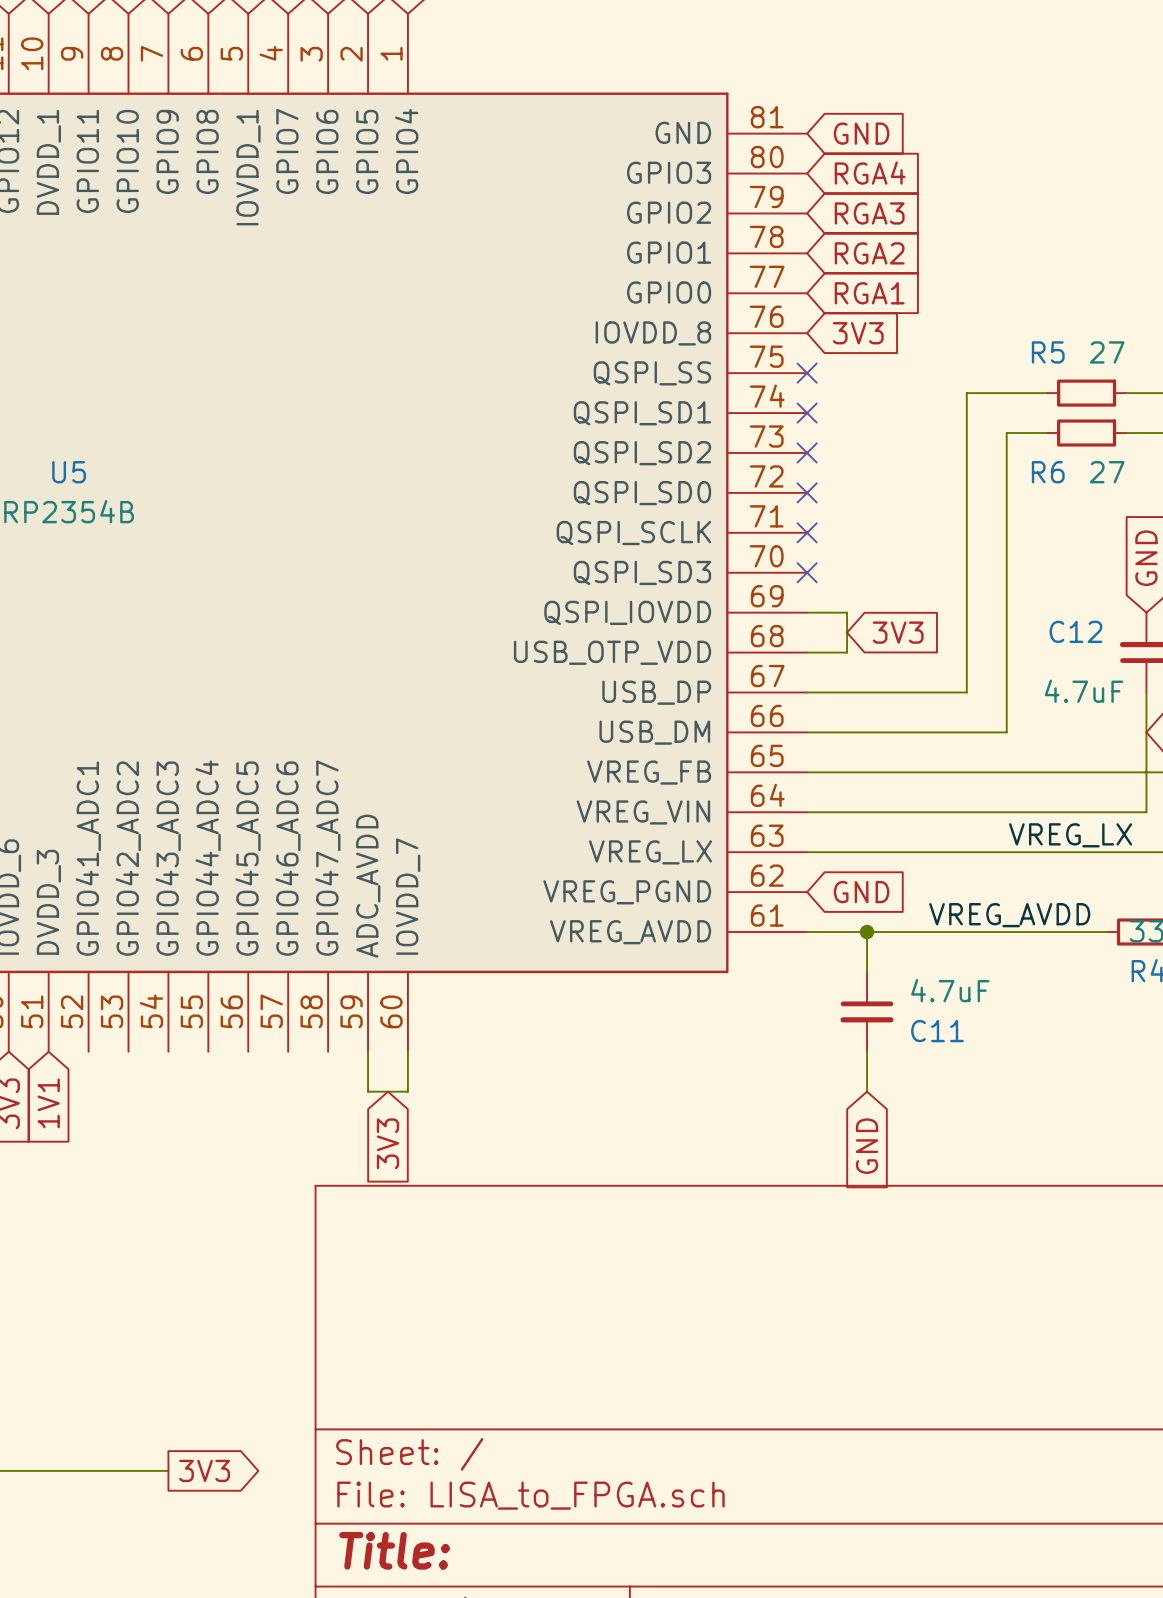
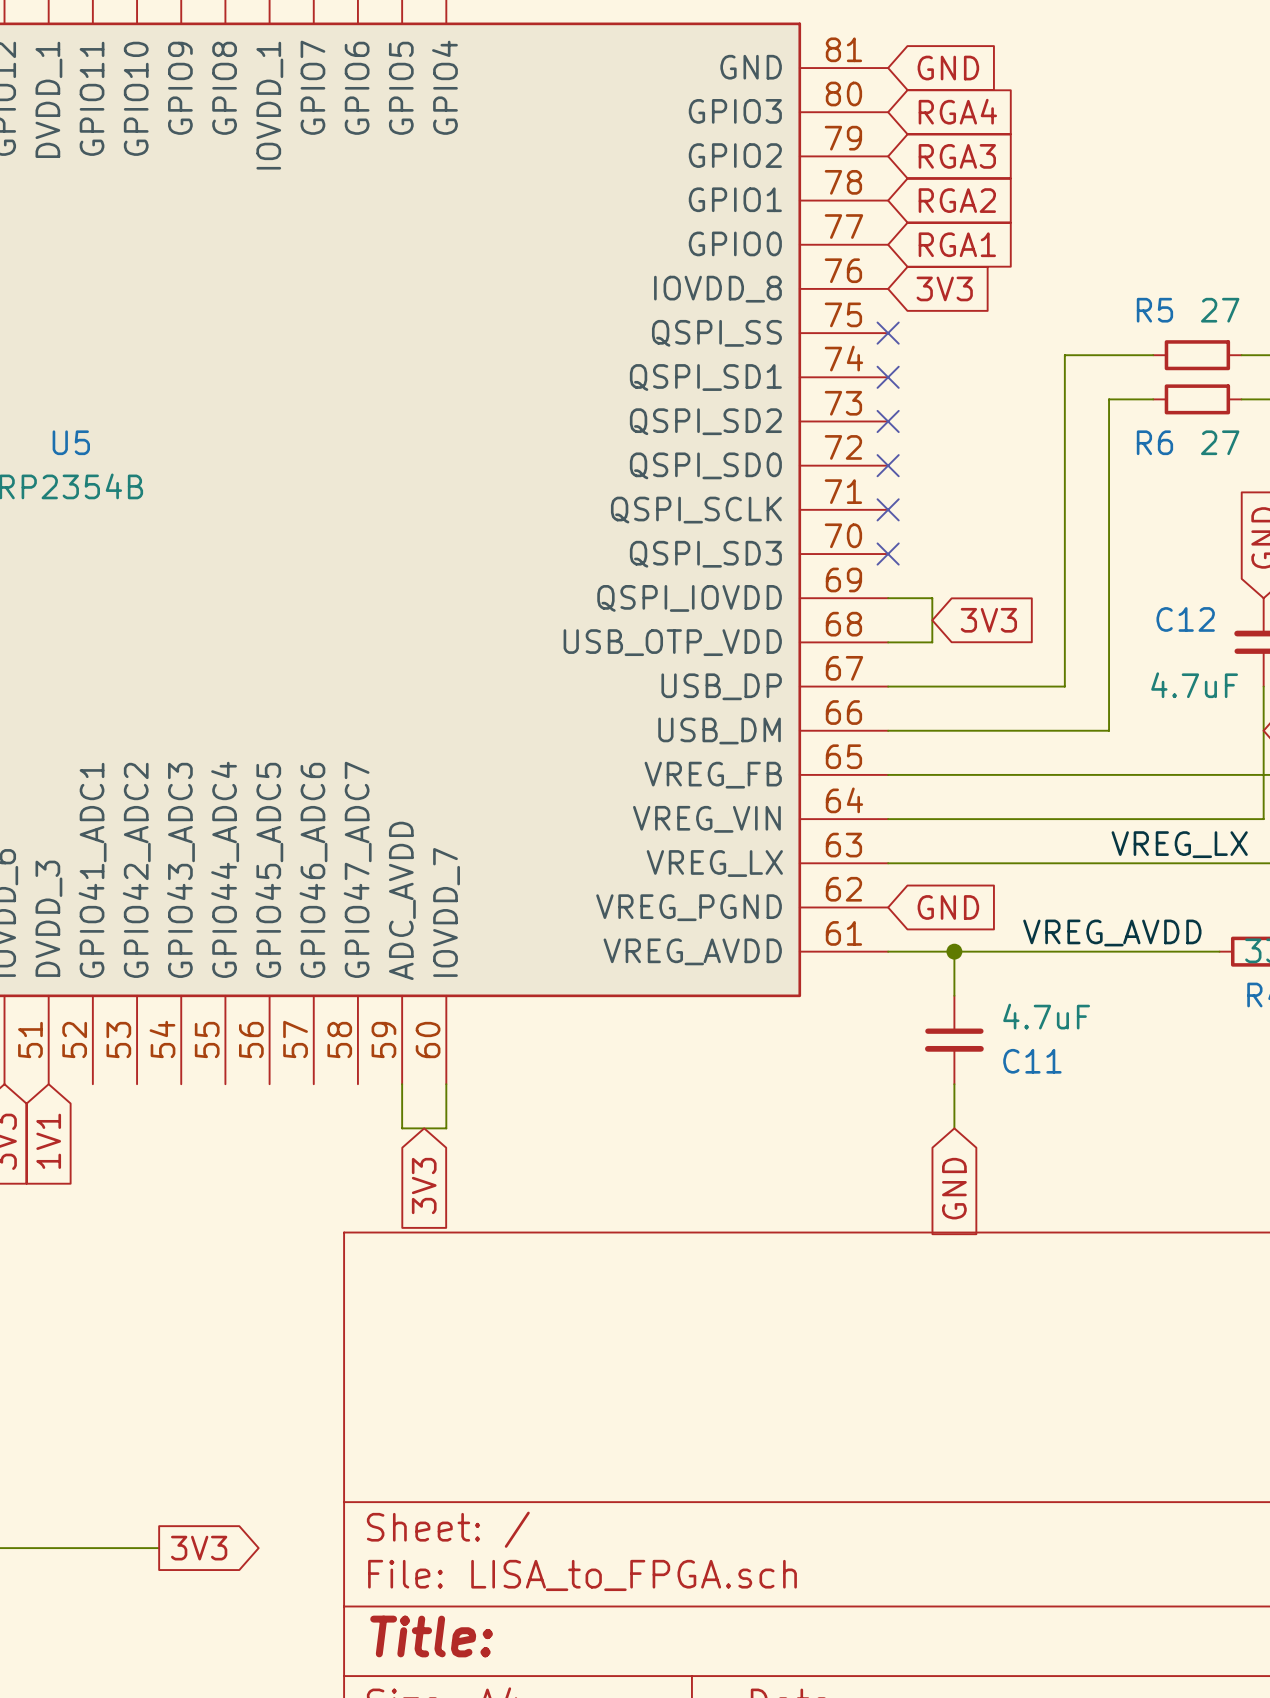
wire: (148, 1470) (168, 1470) -> none
global label position: 3V3 (204, 1470) -> 3V3 (199, 1548)

